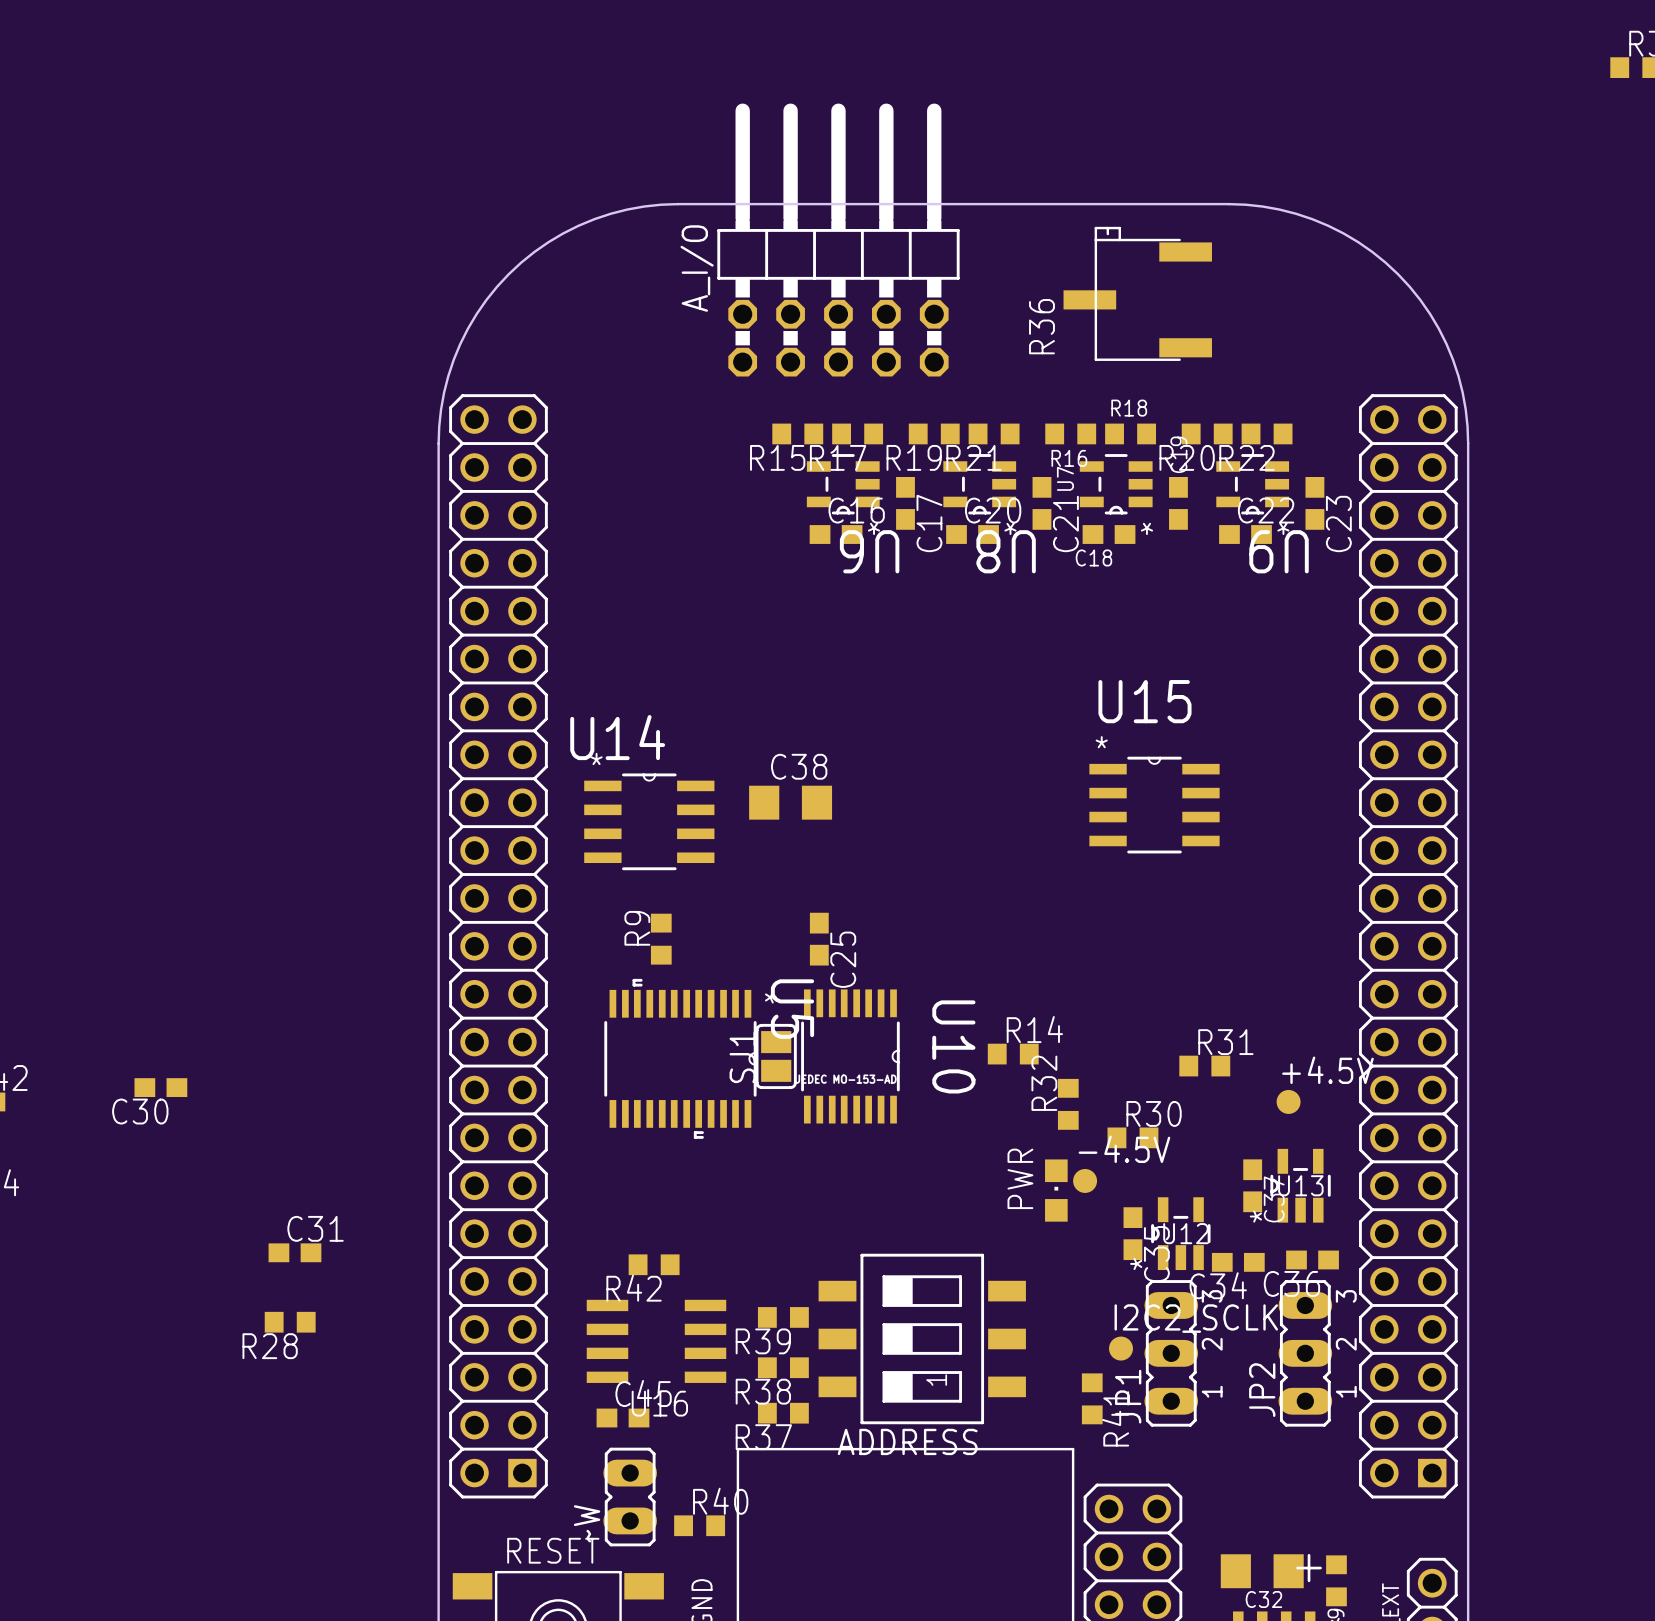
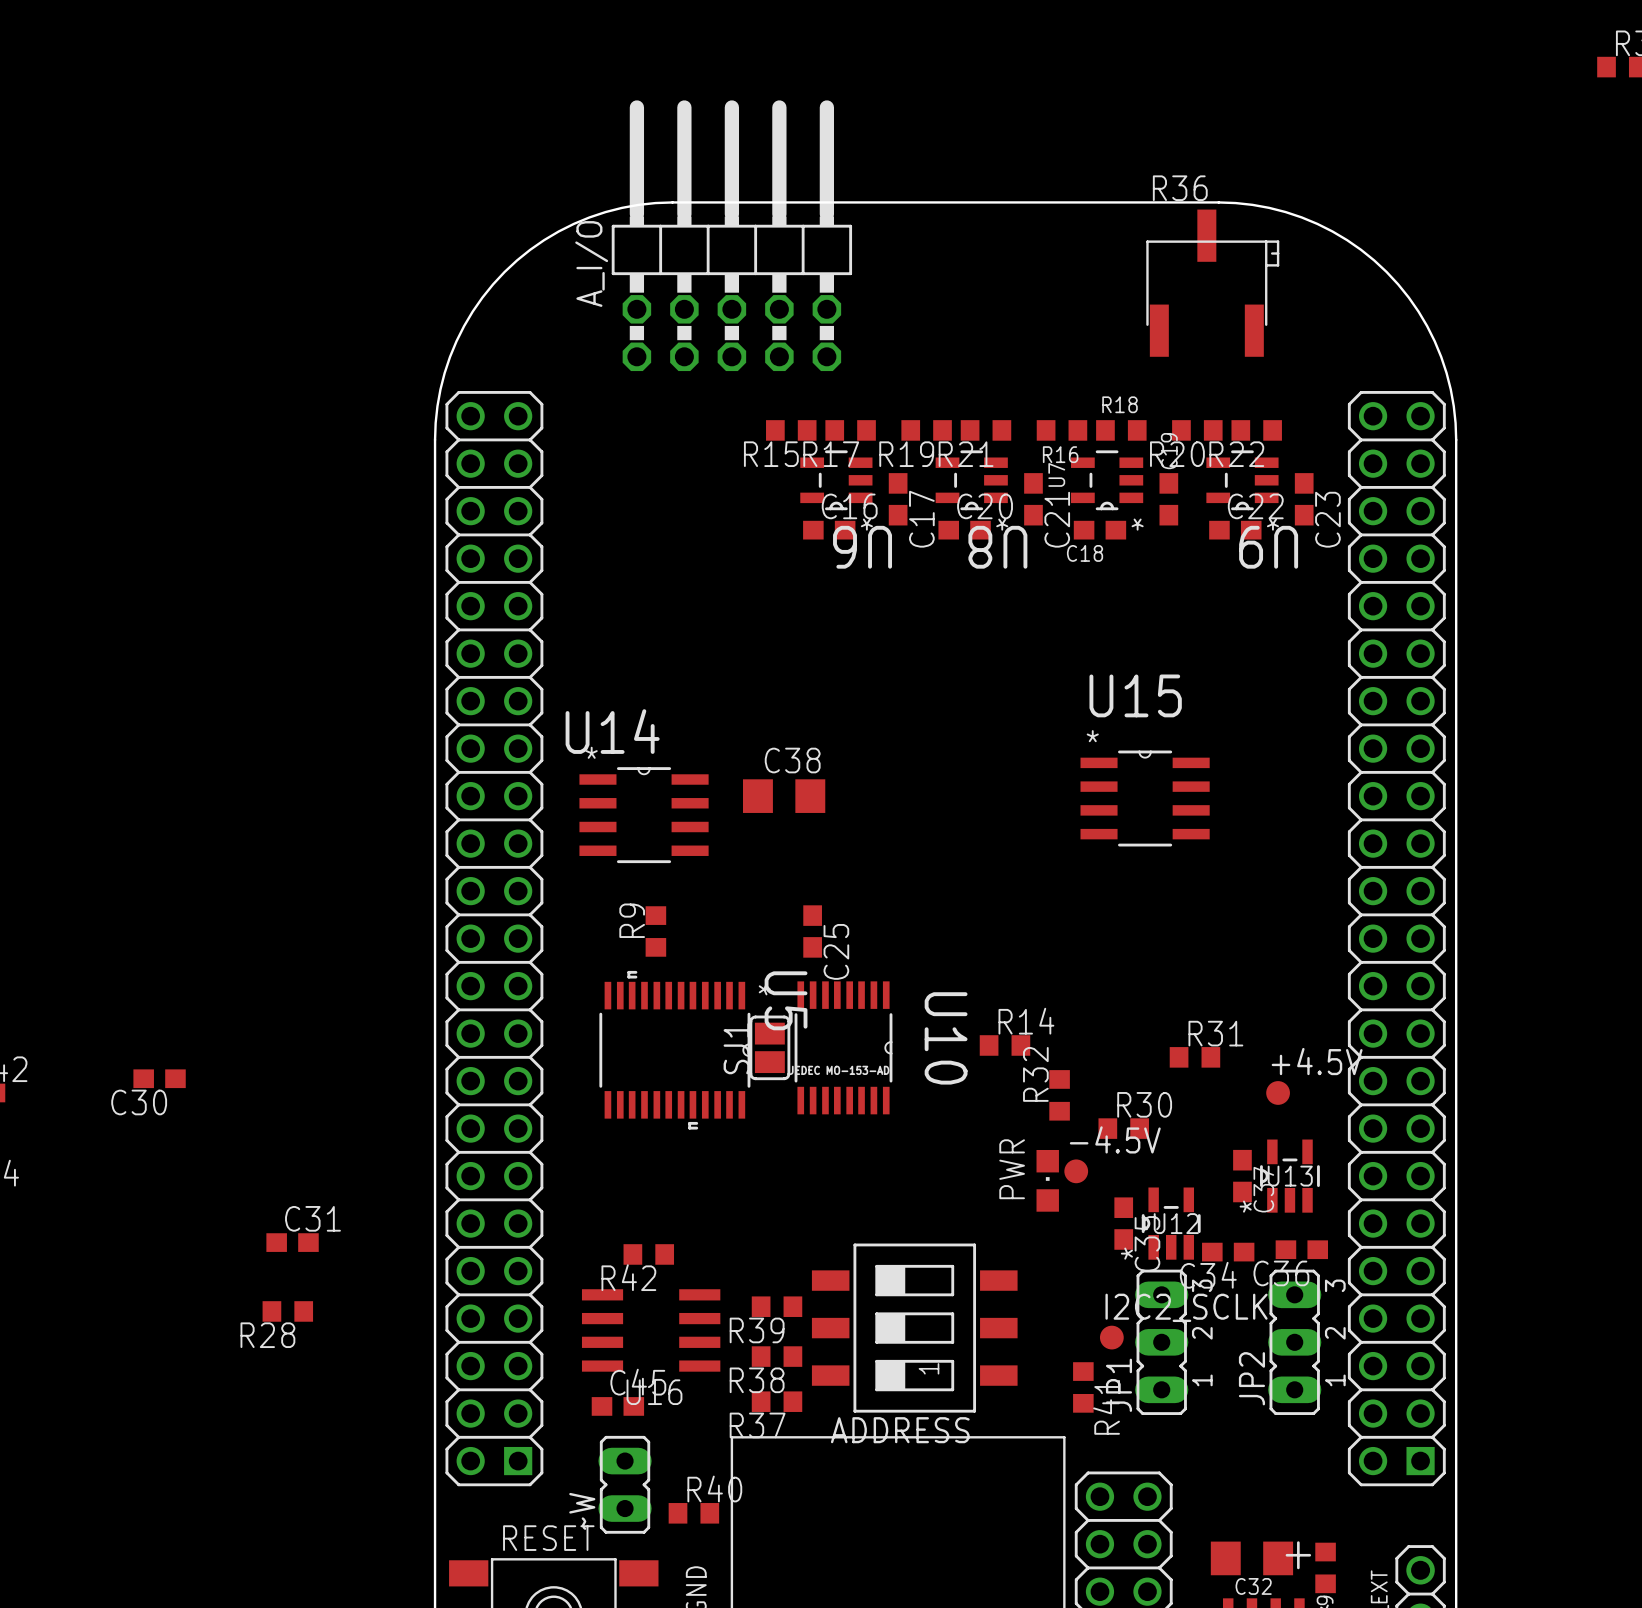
A_I/O position: (838, 240) -> (731, 235)
R36 rotation: 0° (1137, 293) -> 90° clockwise (1212, 283)

